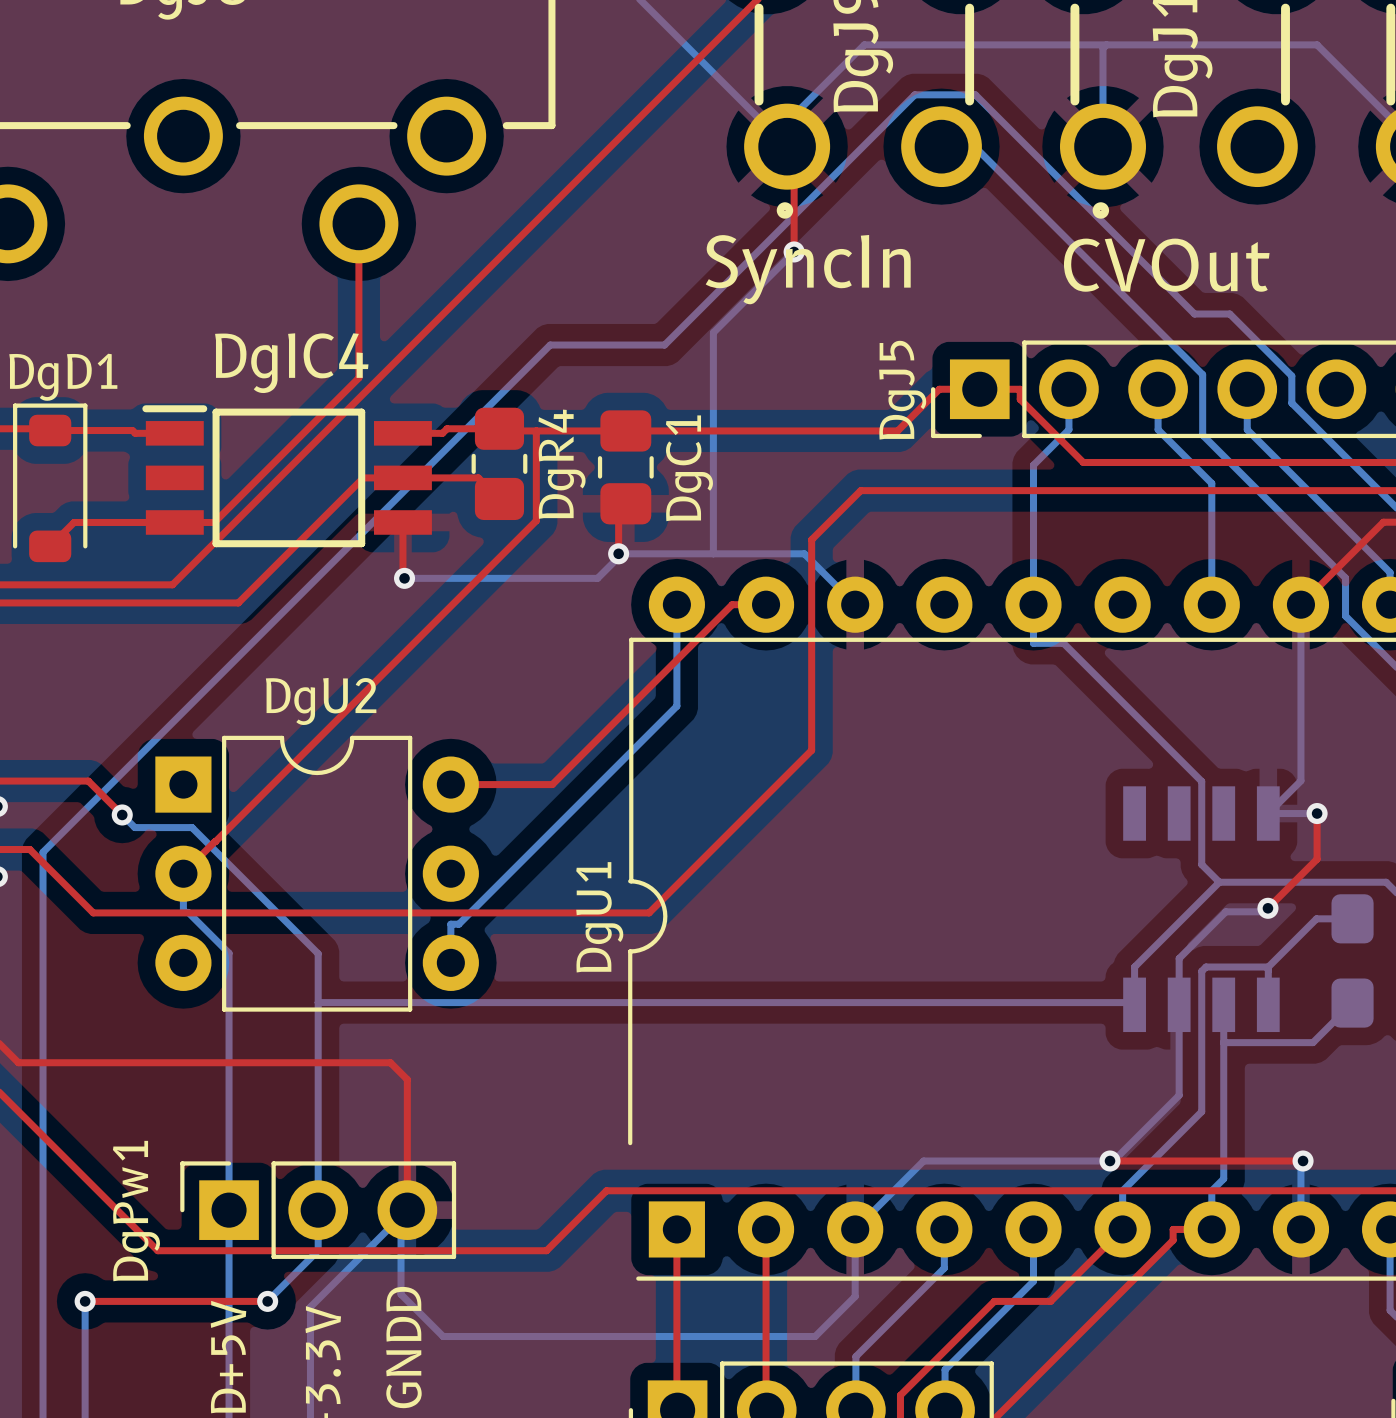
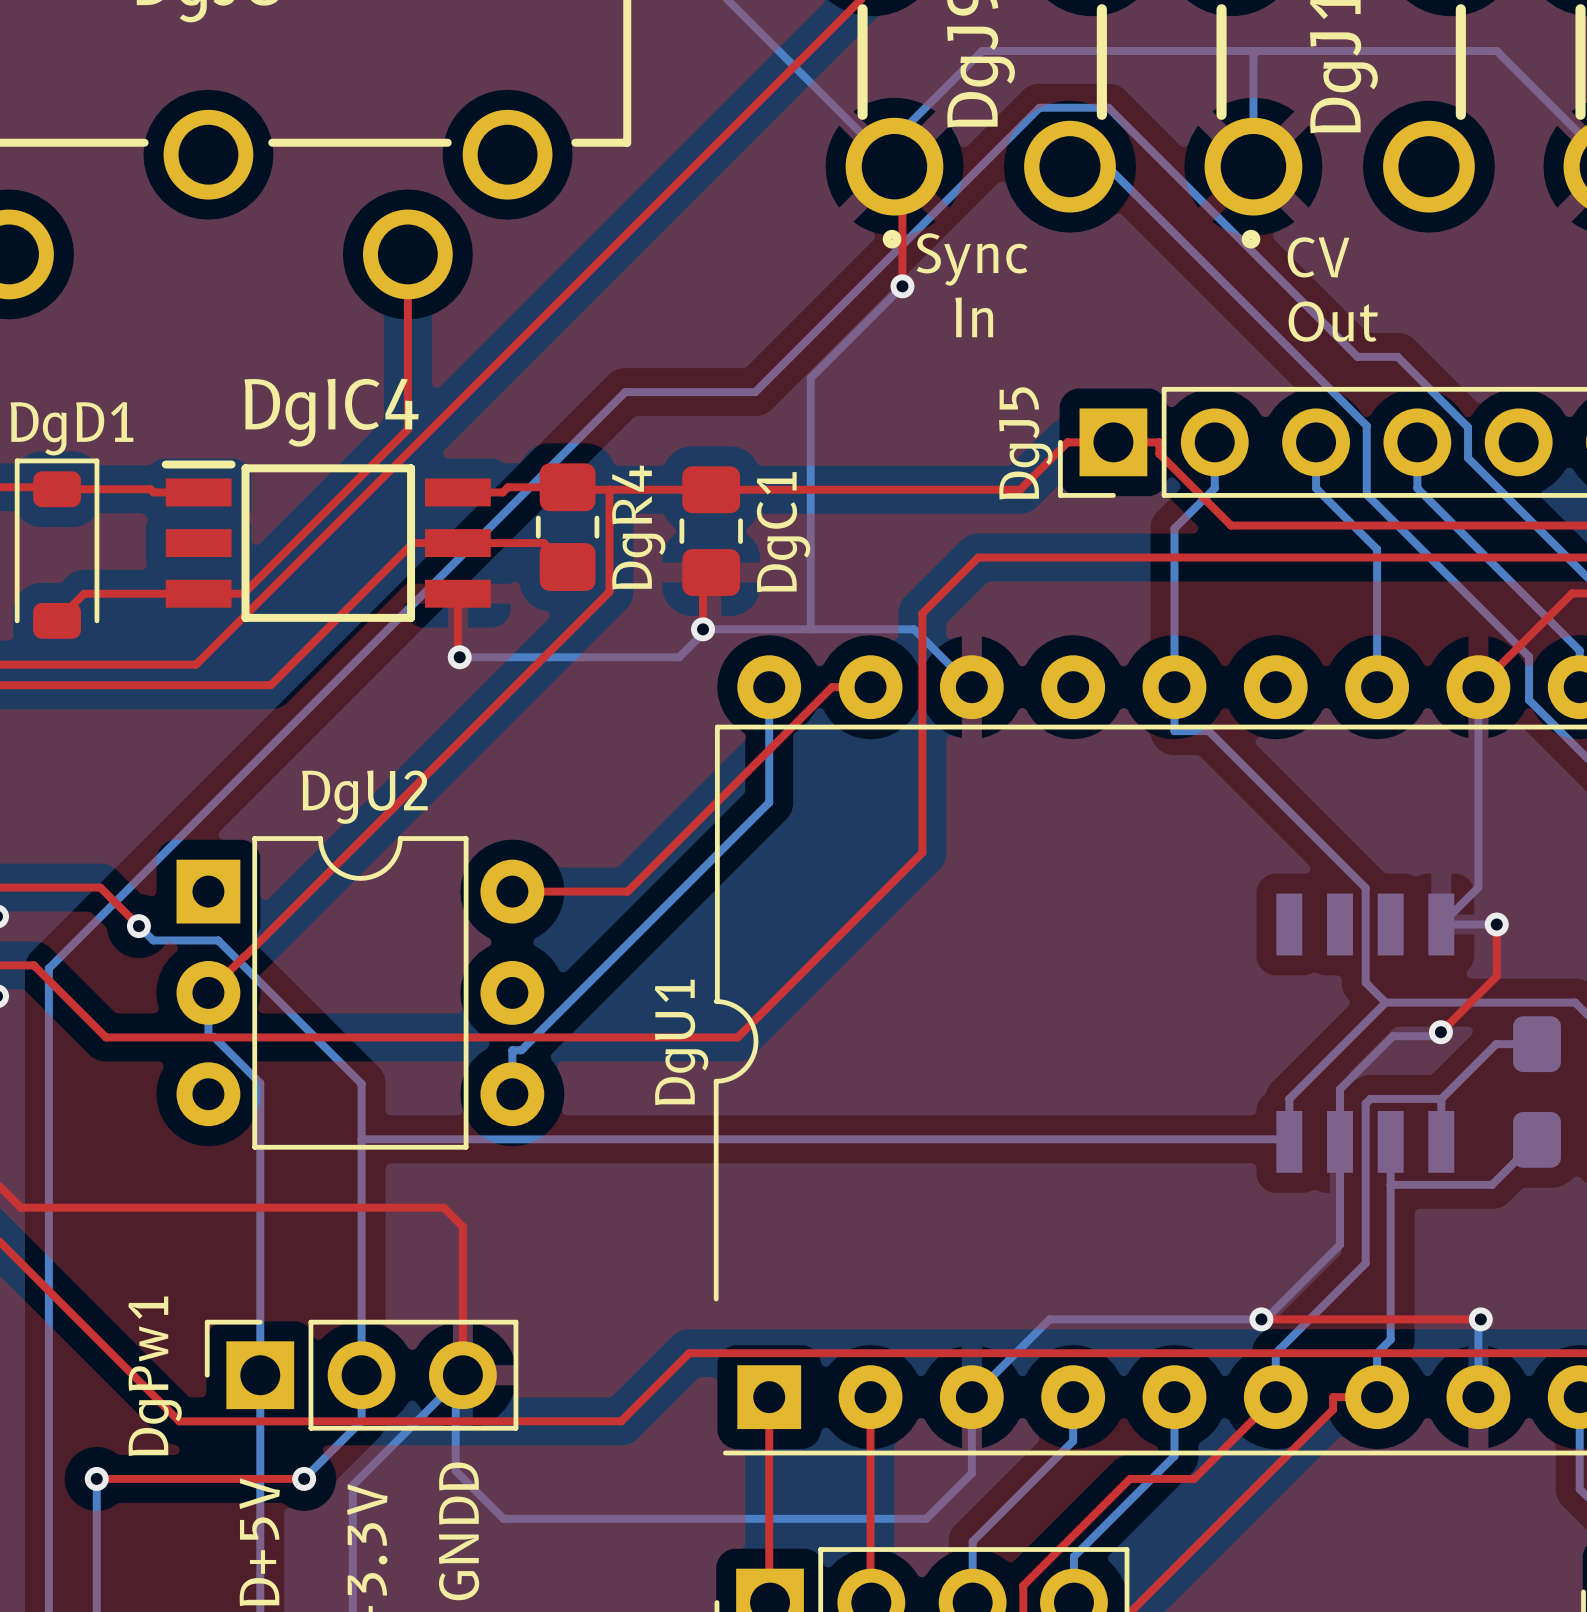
text: none -> CV (1318, 257)
text: CVOut (1166, 265) -> Out (1333, 321)
text: SyncIn (808, 269) -> Sync (971, 259)
text: none -> In (974, 317)

